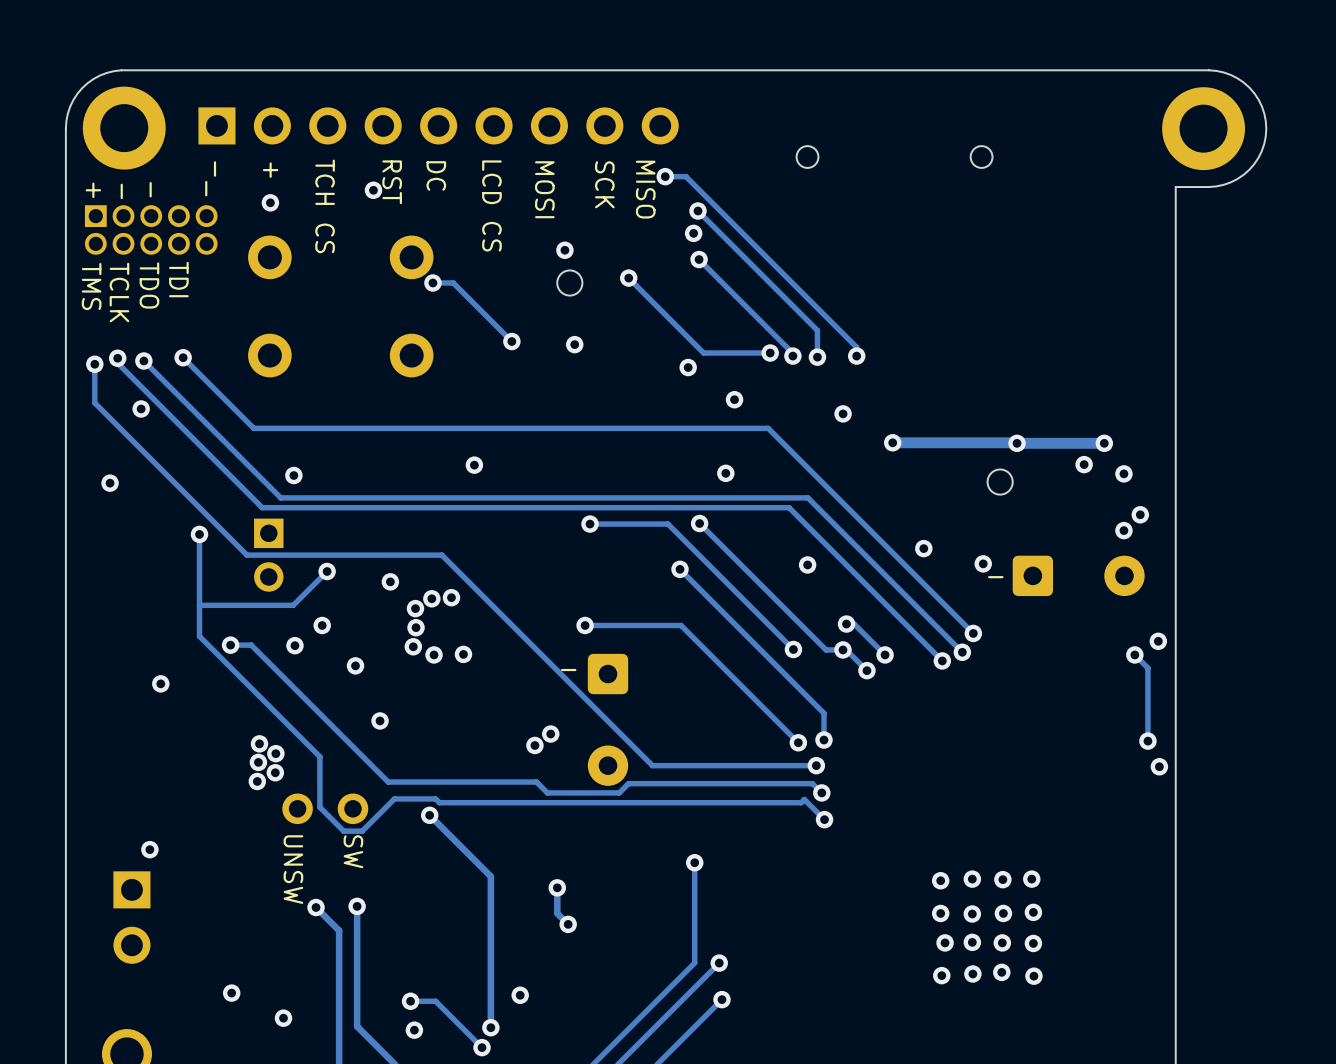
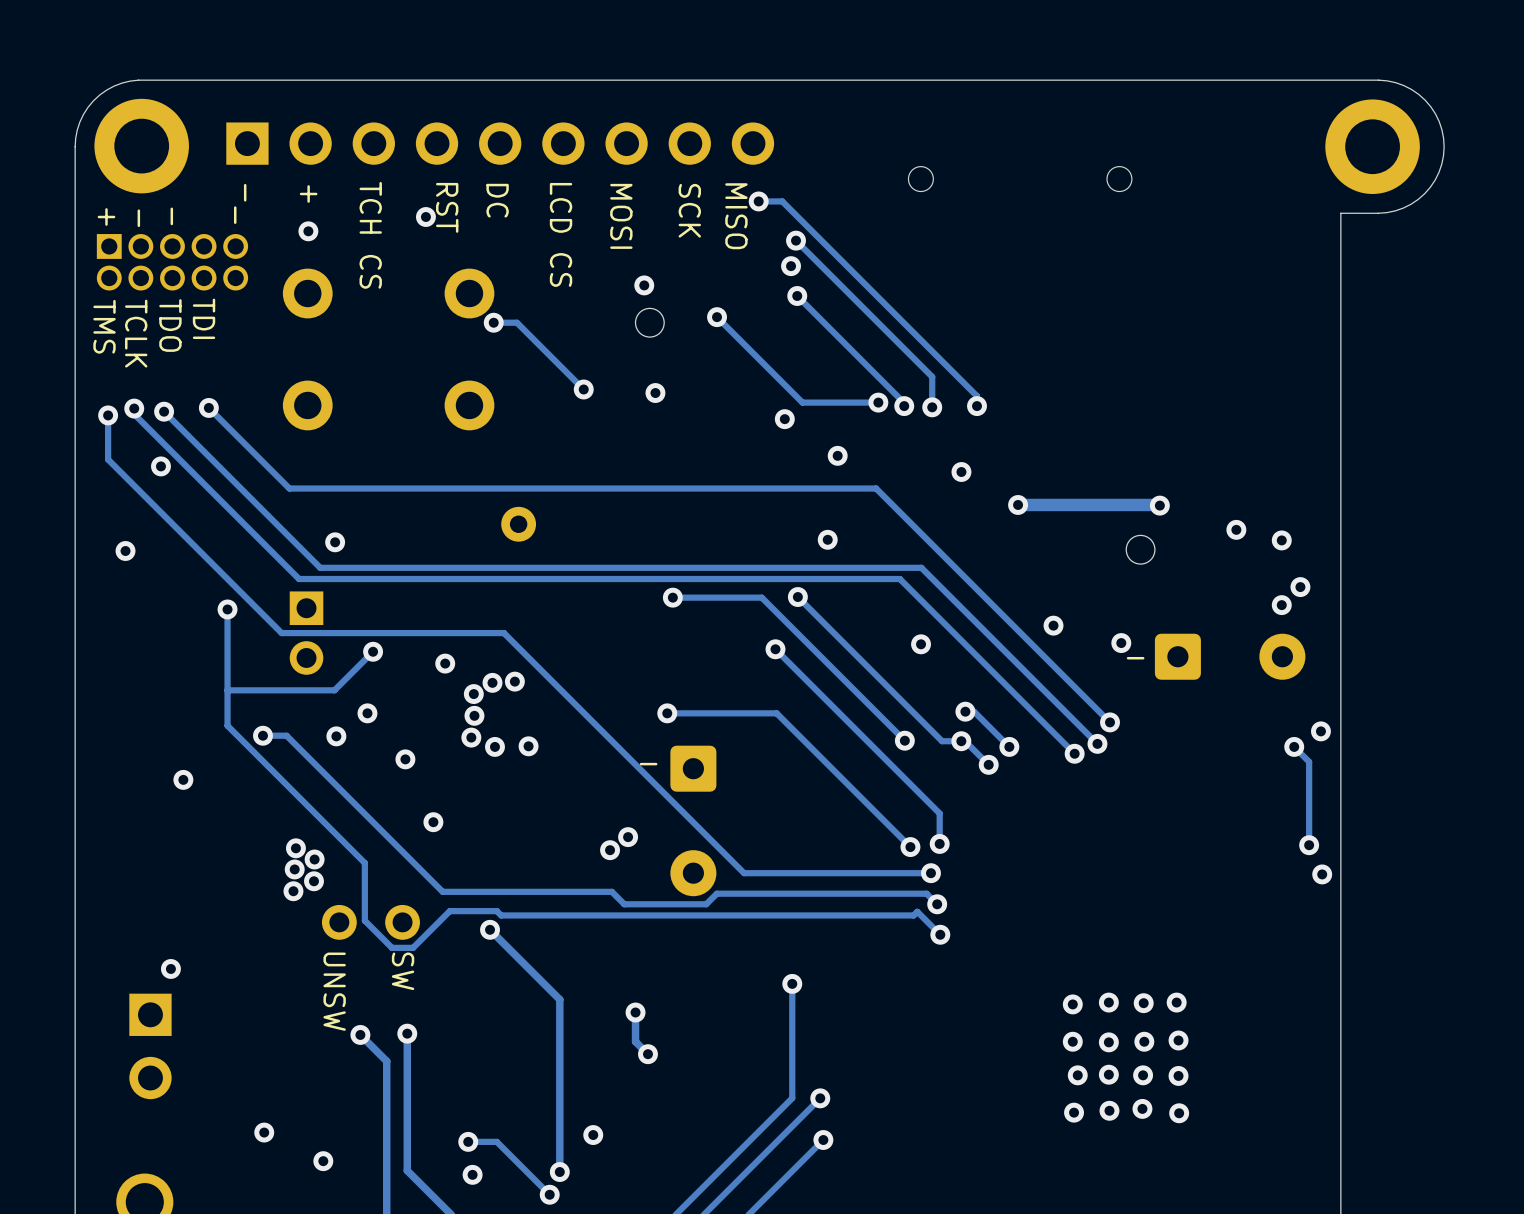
track: (1104, 443) (1017, 443) -> none
via: (1104, 443) -> none
part: none -> (518, 524)
via: (474, 465) -> none

